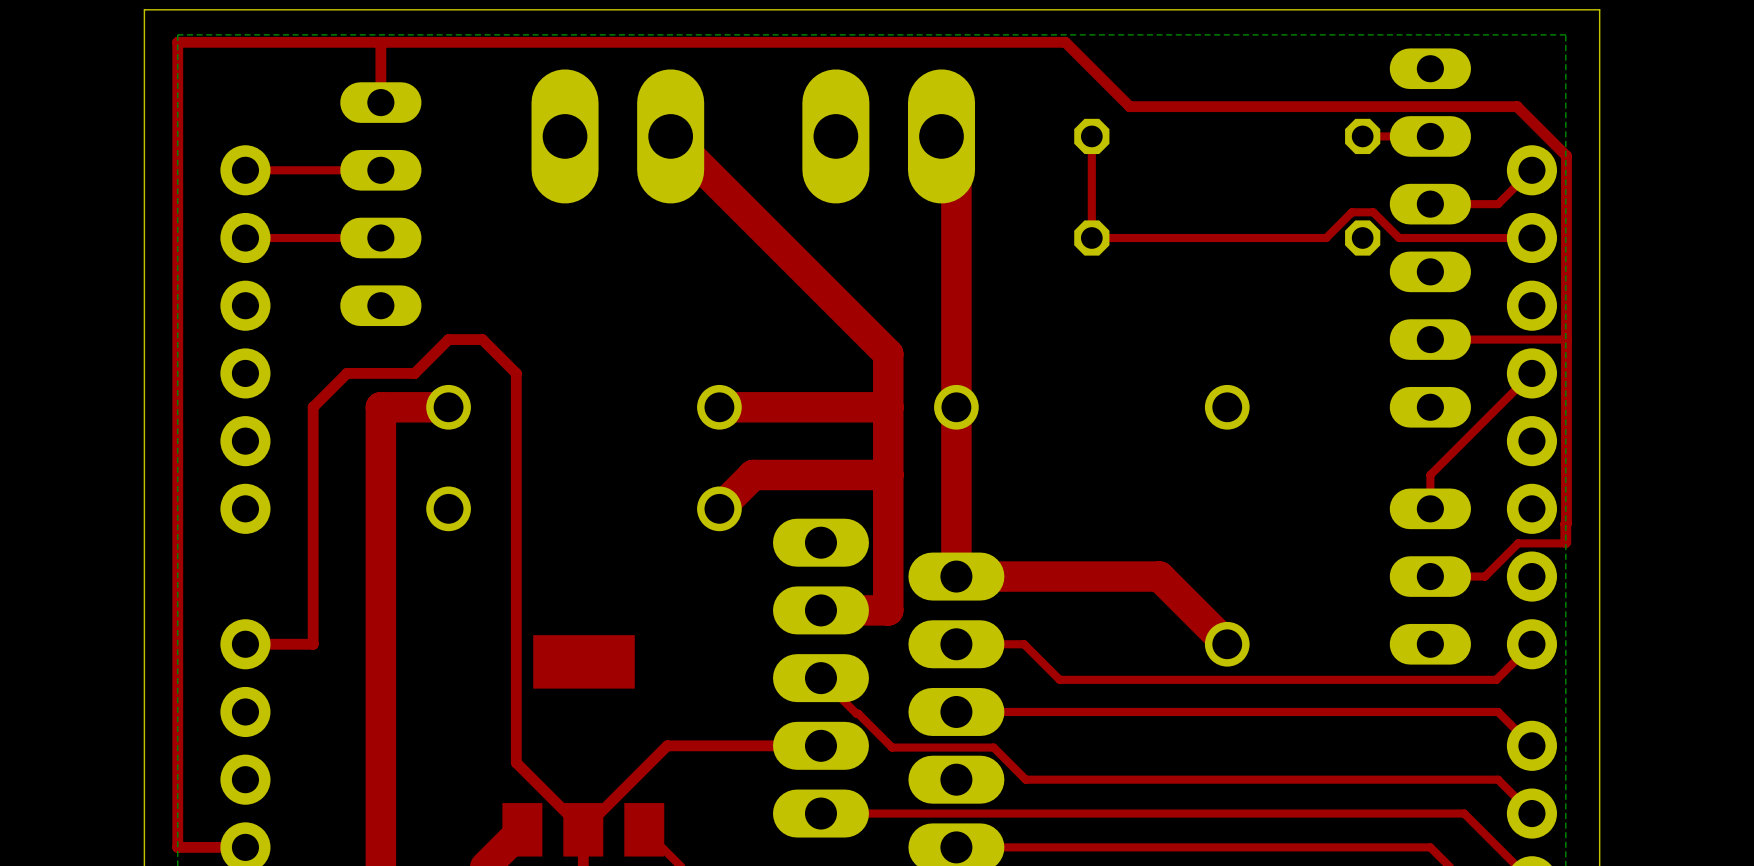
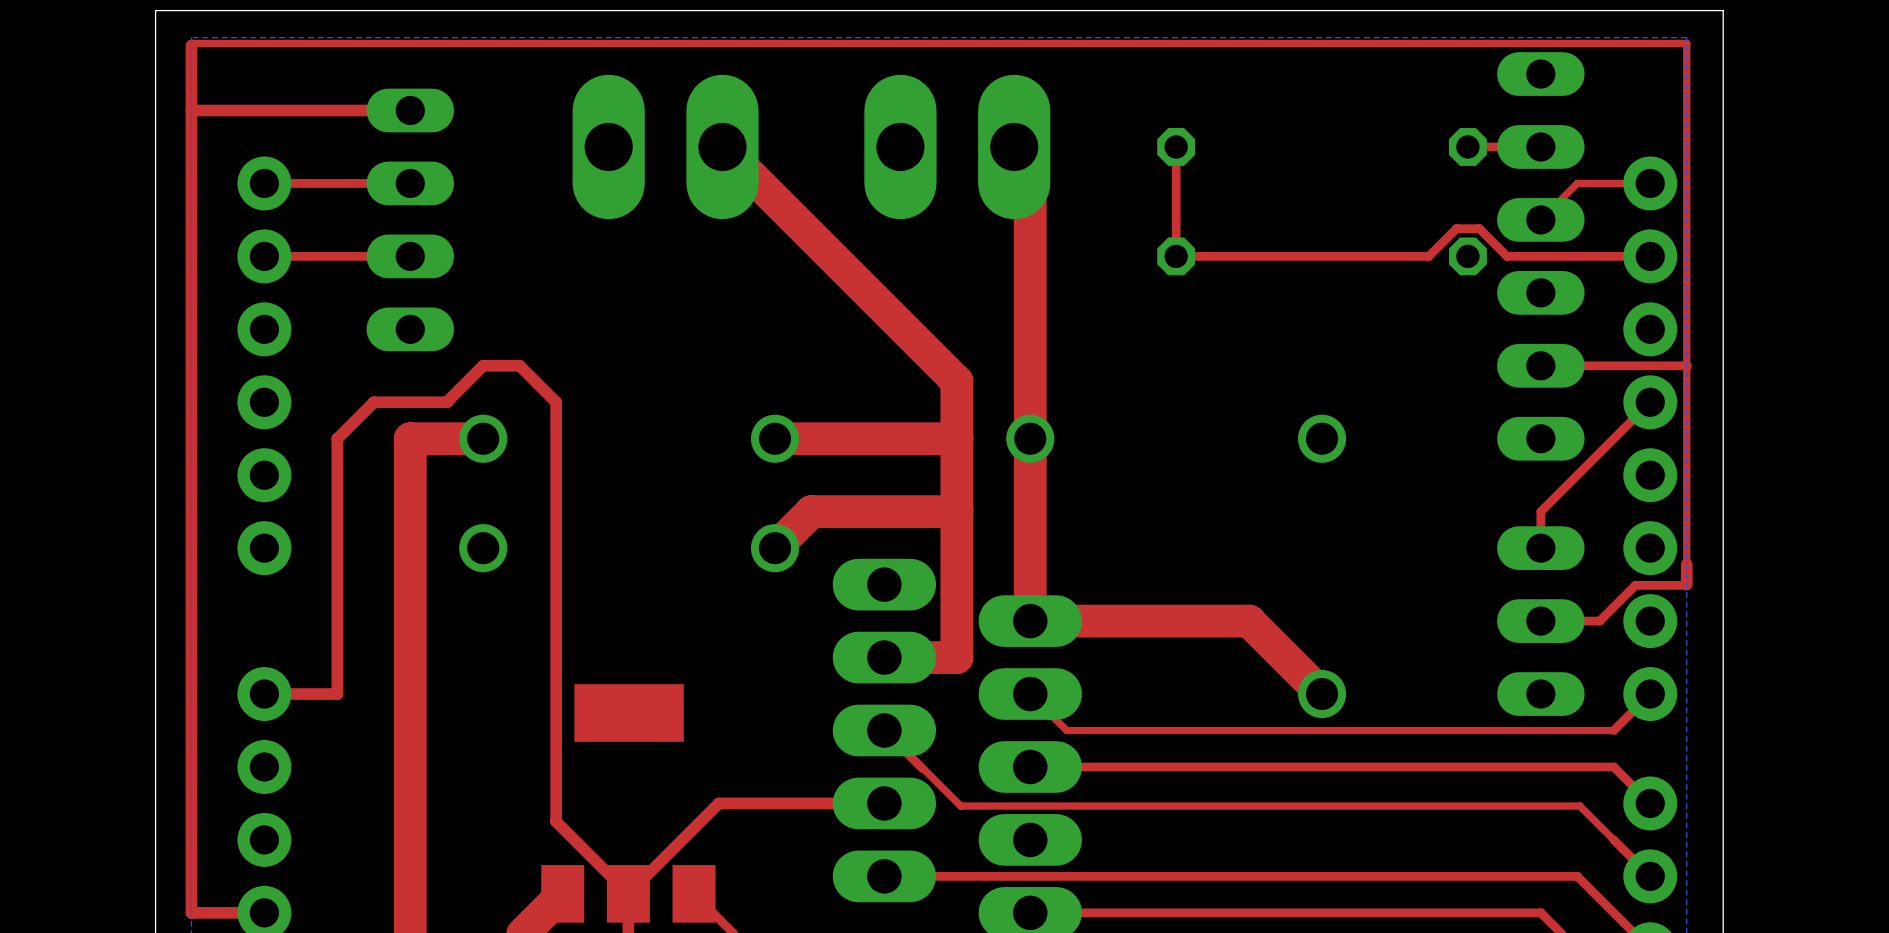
top track: (177, 42) (1065, 42) (1129, 106) (1517, 106) (1566, 155) (1565, 523) -> (191, 45) (191, 43) (1686, 43) (1686, 564)
top track: (380, 42) (380, 102) -> (191, 110) (410, 110)
top track: (1531, 170) (1498, 204) (1430, 204) -> (1650, 183) (1577, 183) (1540, 219)
top track: (956, 644) (1024, 644) (1059, 679) (1496, 679) (1498, 678) -> (1030, 694) (1066, 730) (1613, 730)
top track: (856, 713) (892, 747) (993, 747) (1025, 779) (1498, 779) -> (922, 768) (960, 806) (1579, 806) (1613, 839)

